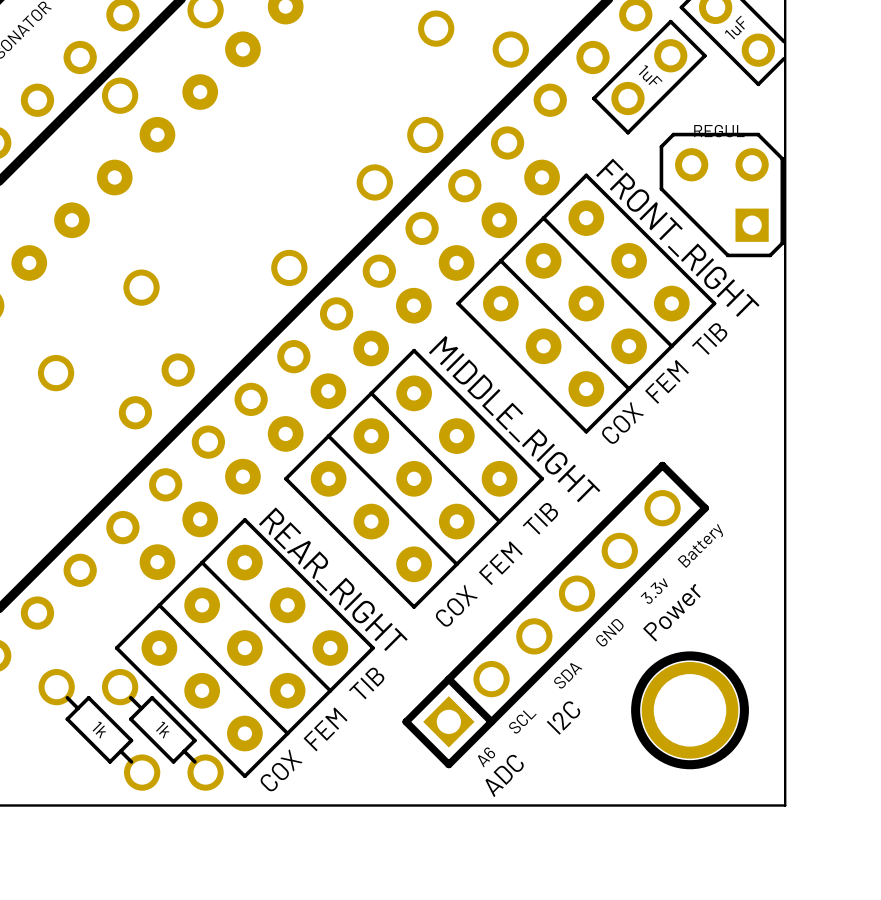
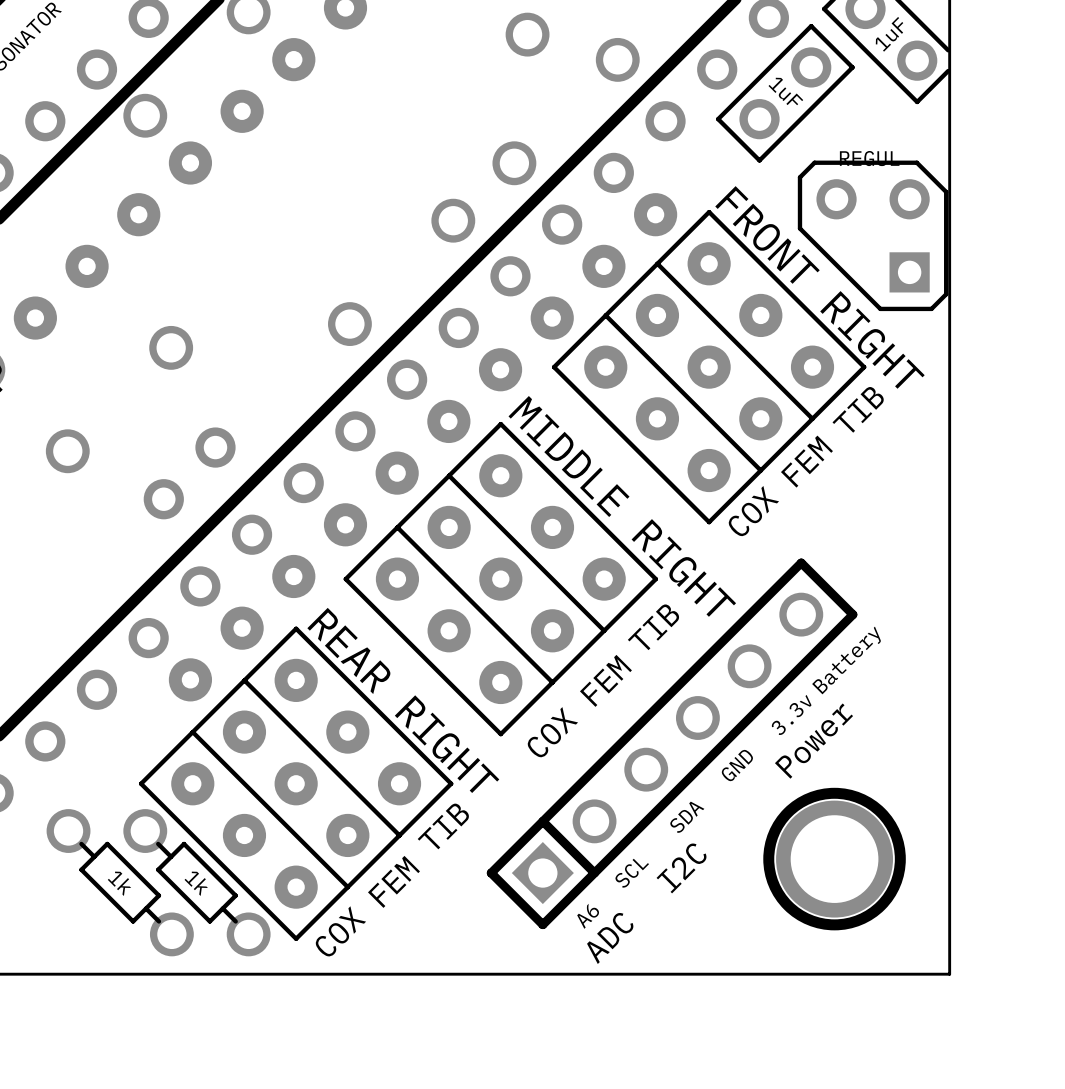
part value: FRONT_RIGHT (677, 237) -> FRONT RIGHT (819, 287)
part value: MIDDLE_RIGHT (514, 419) -> MIDDLE RIGHT (622, 506)
part value: REAR_RIGHT (333, 579) -> REAR RIGHT (403, 700)

